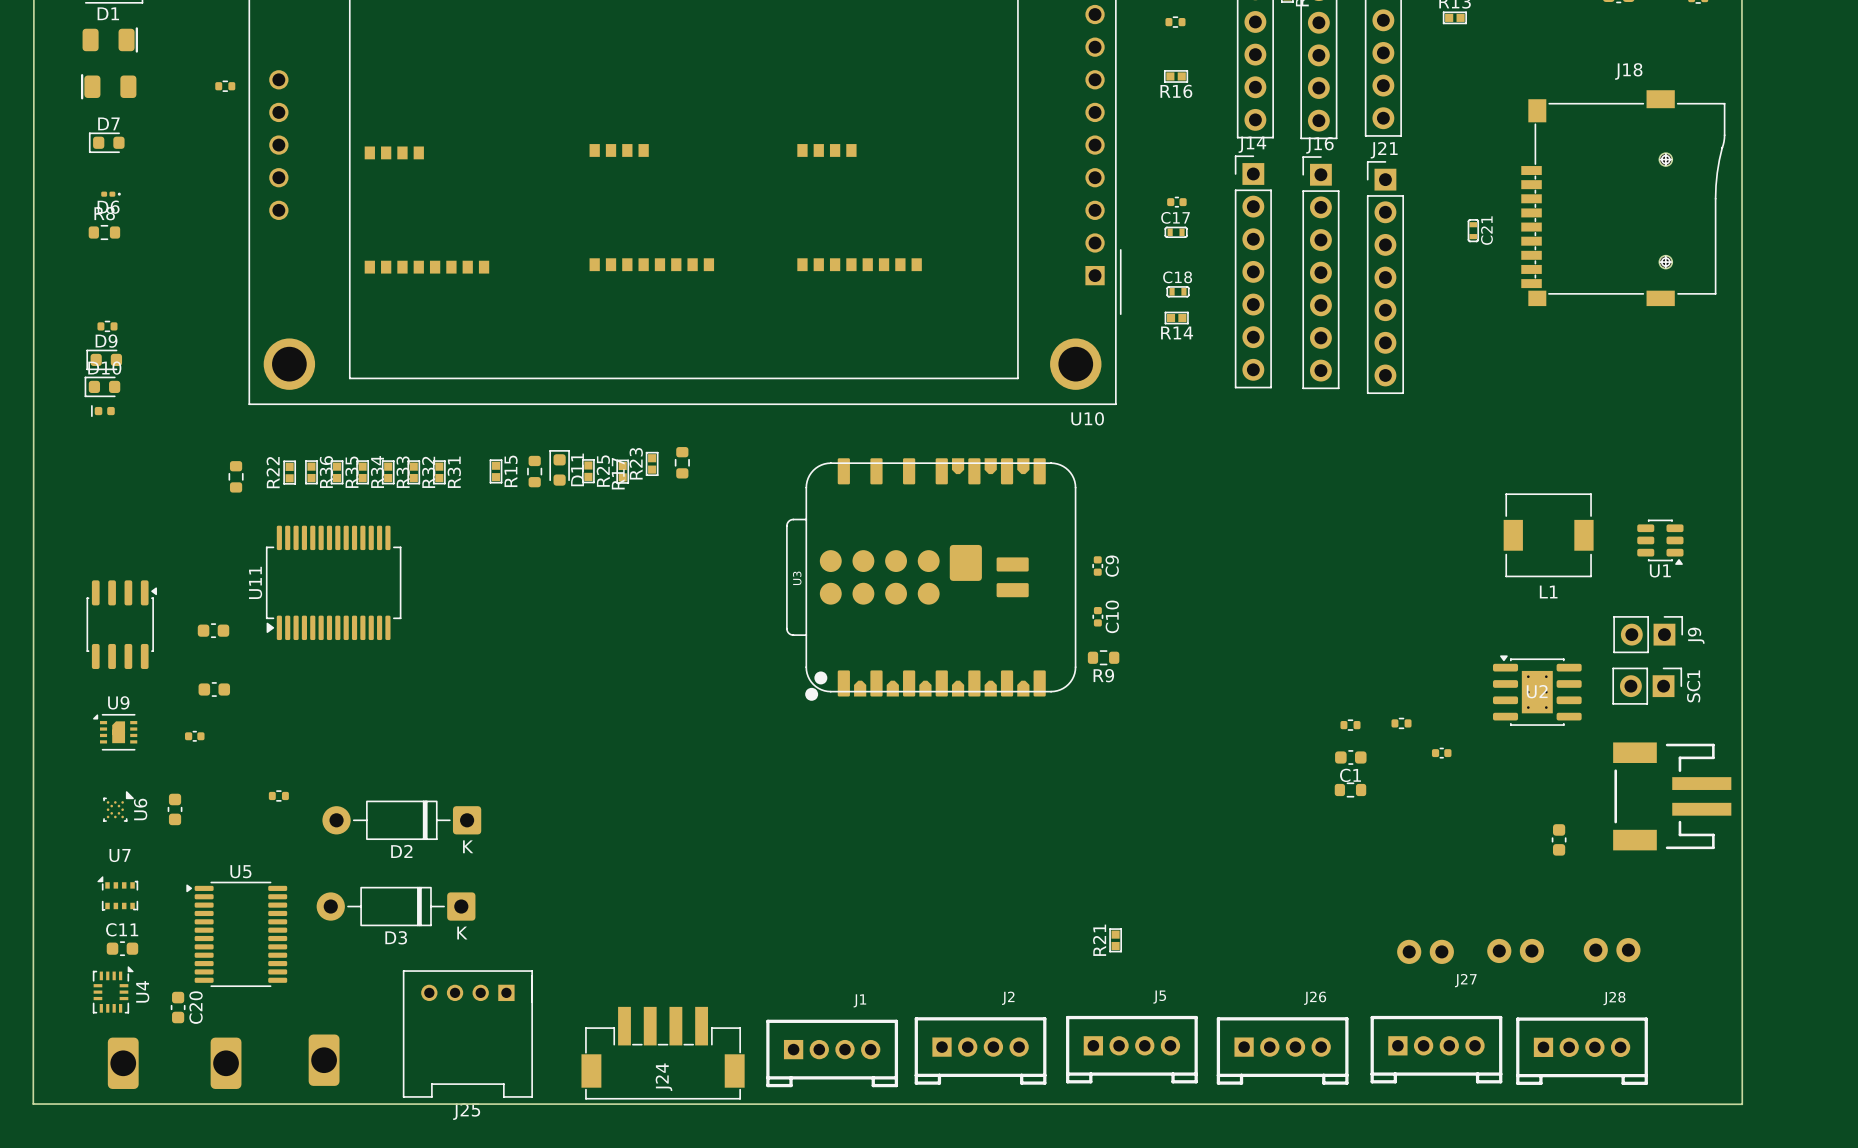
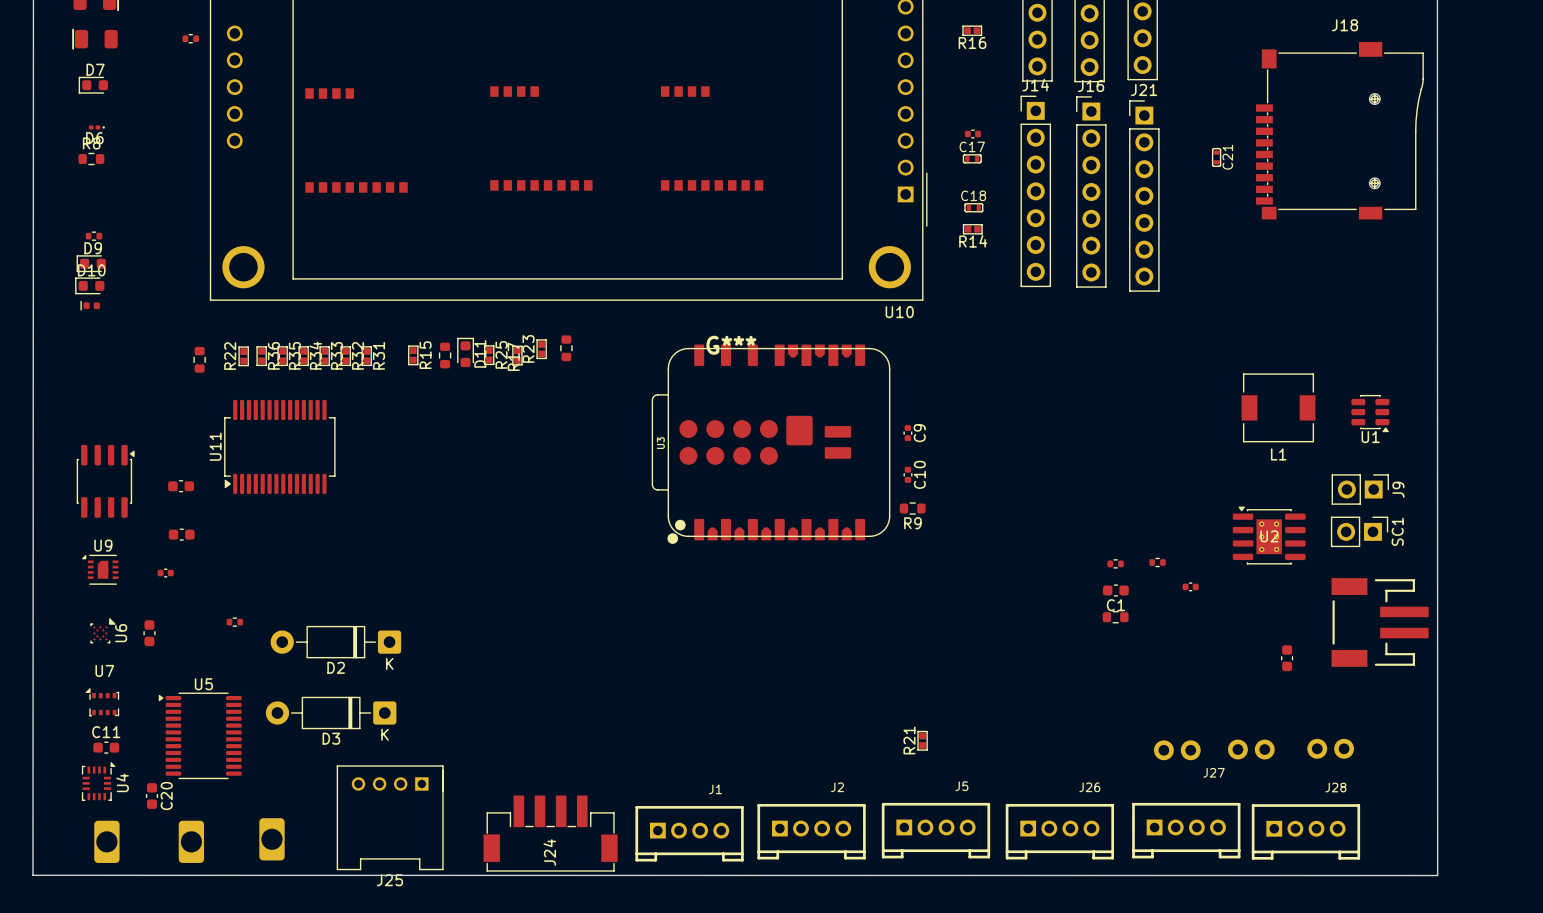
G***: none -> (731, 345)

